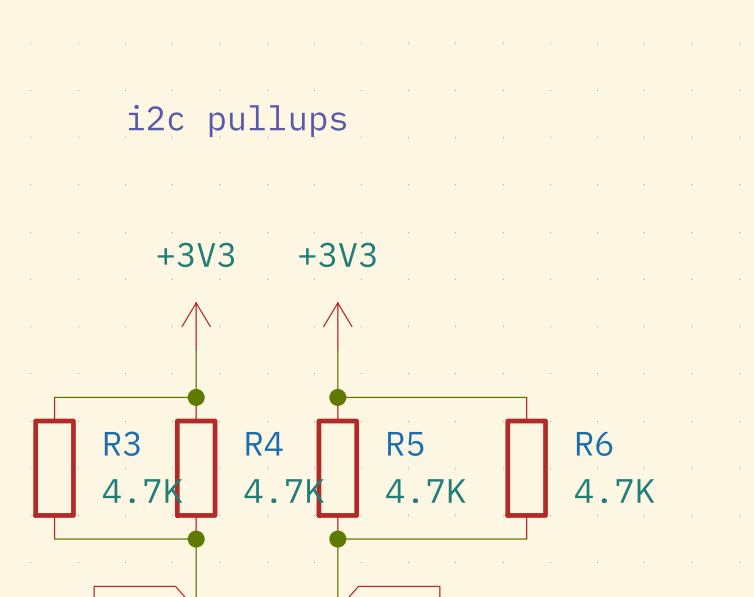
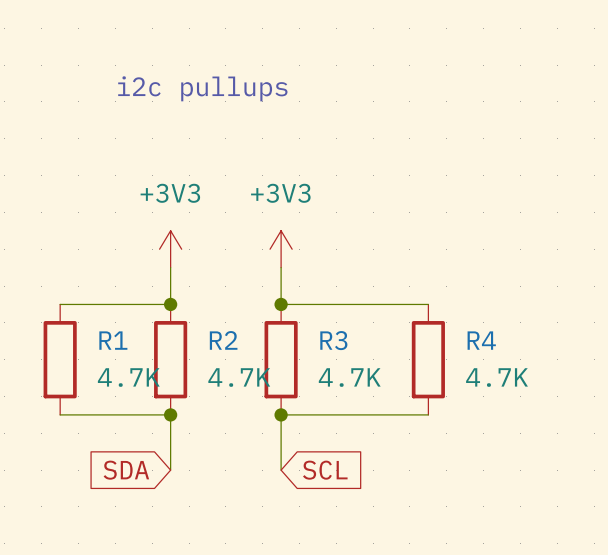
R3 name: R3 (122, 443) -> R1 (113, 340)
R4 name: R4 (264, 443) -> R2 (223, 340)
R5 name: R5 (405, 443) -> R3 (333, 340)
R6 name: R6 (594, 443) -> R4 (481, 340)

